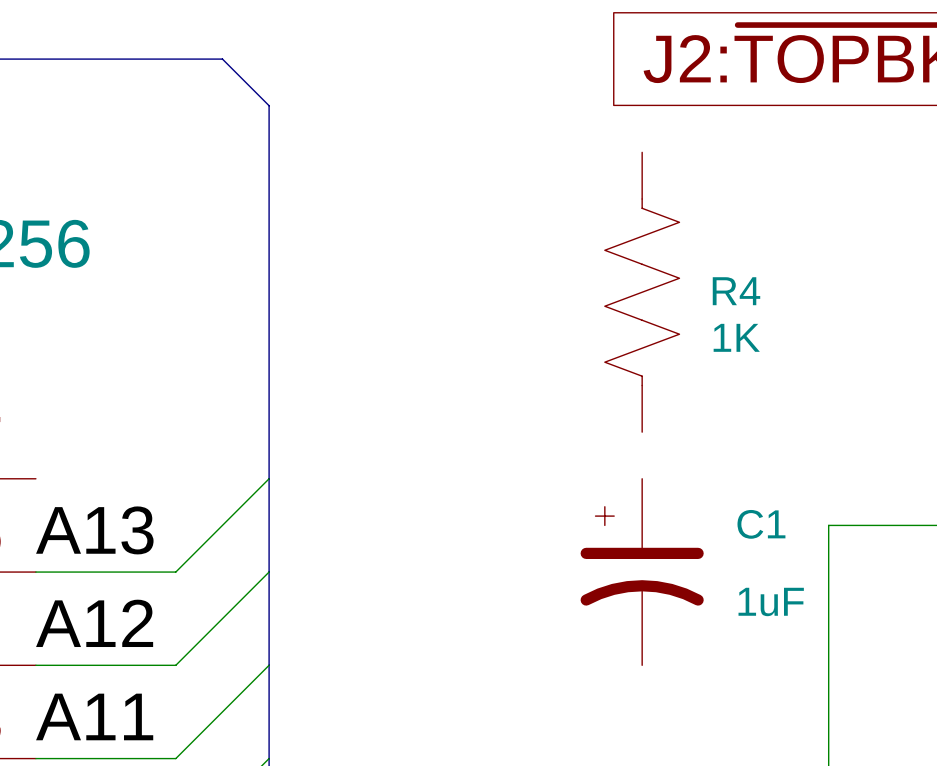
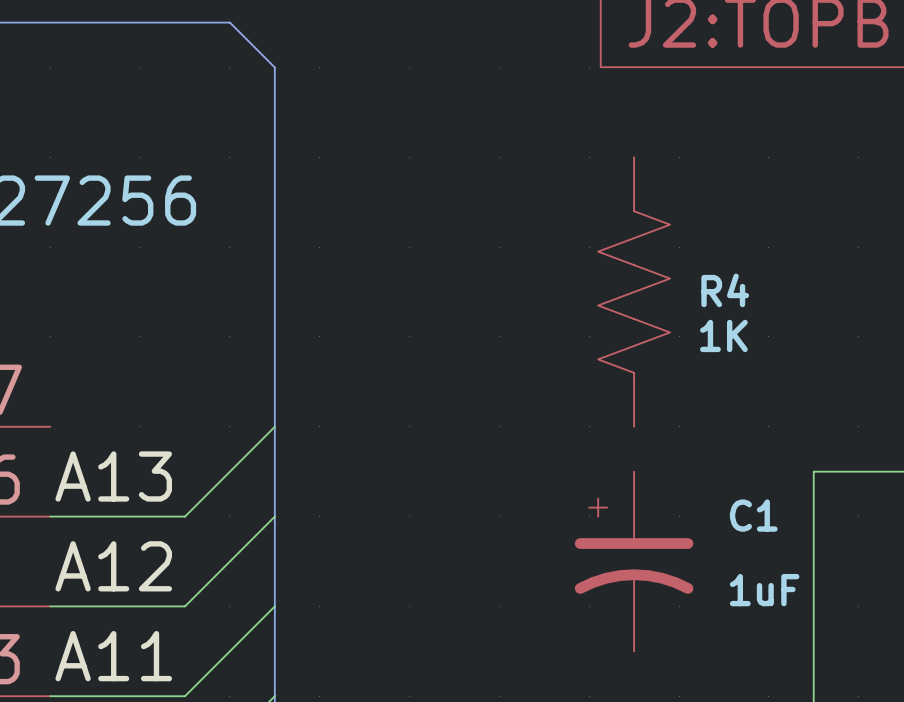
R4 position: (642, 292) -> (634, 292)
C1 position: (642, 572) -> (634, 561)

